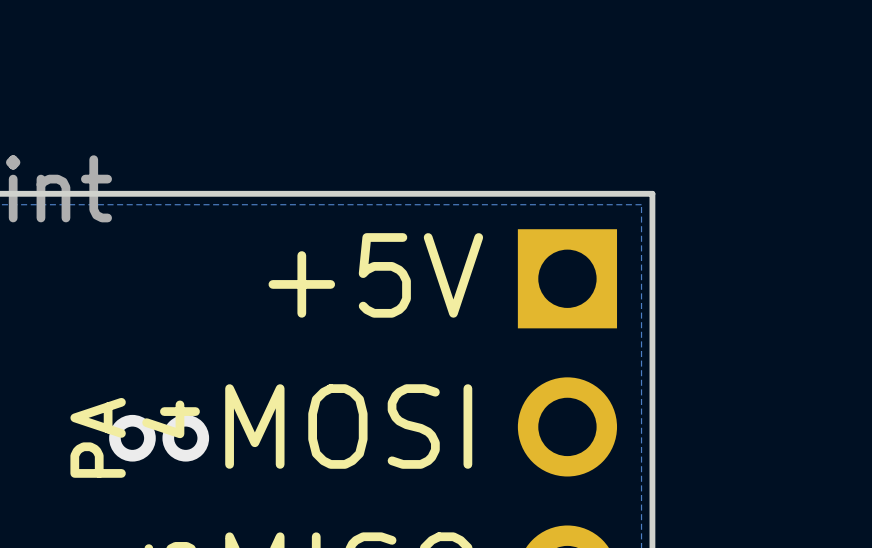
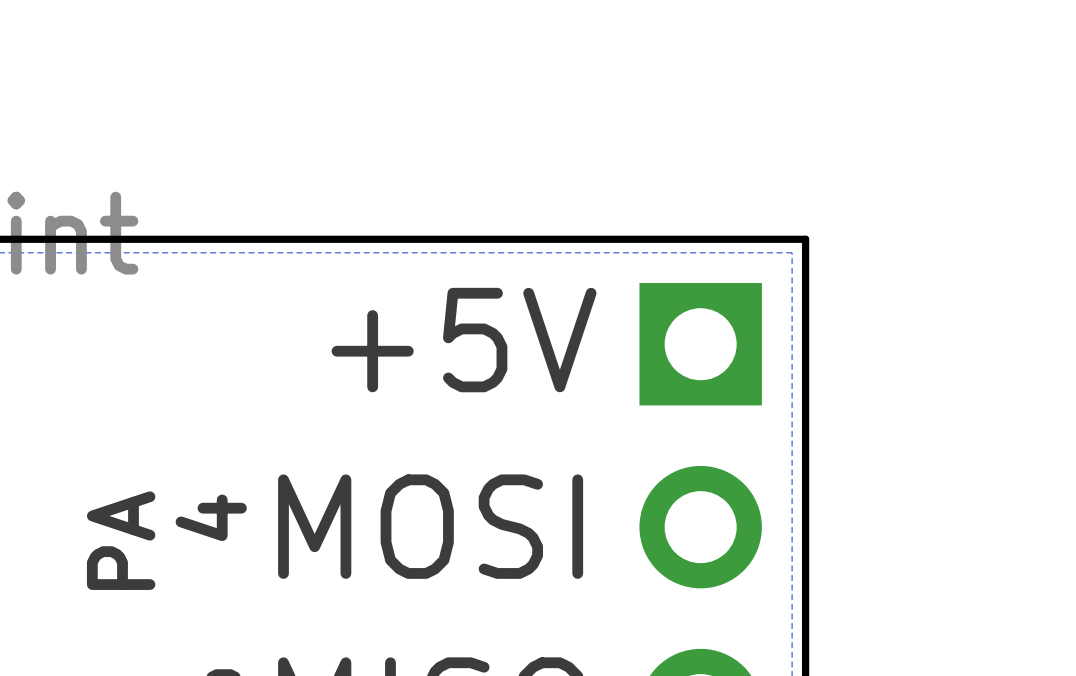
via: (132, 438) -> none
via: (185, 438) -> none

